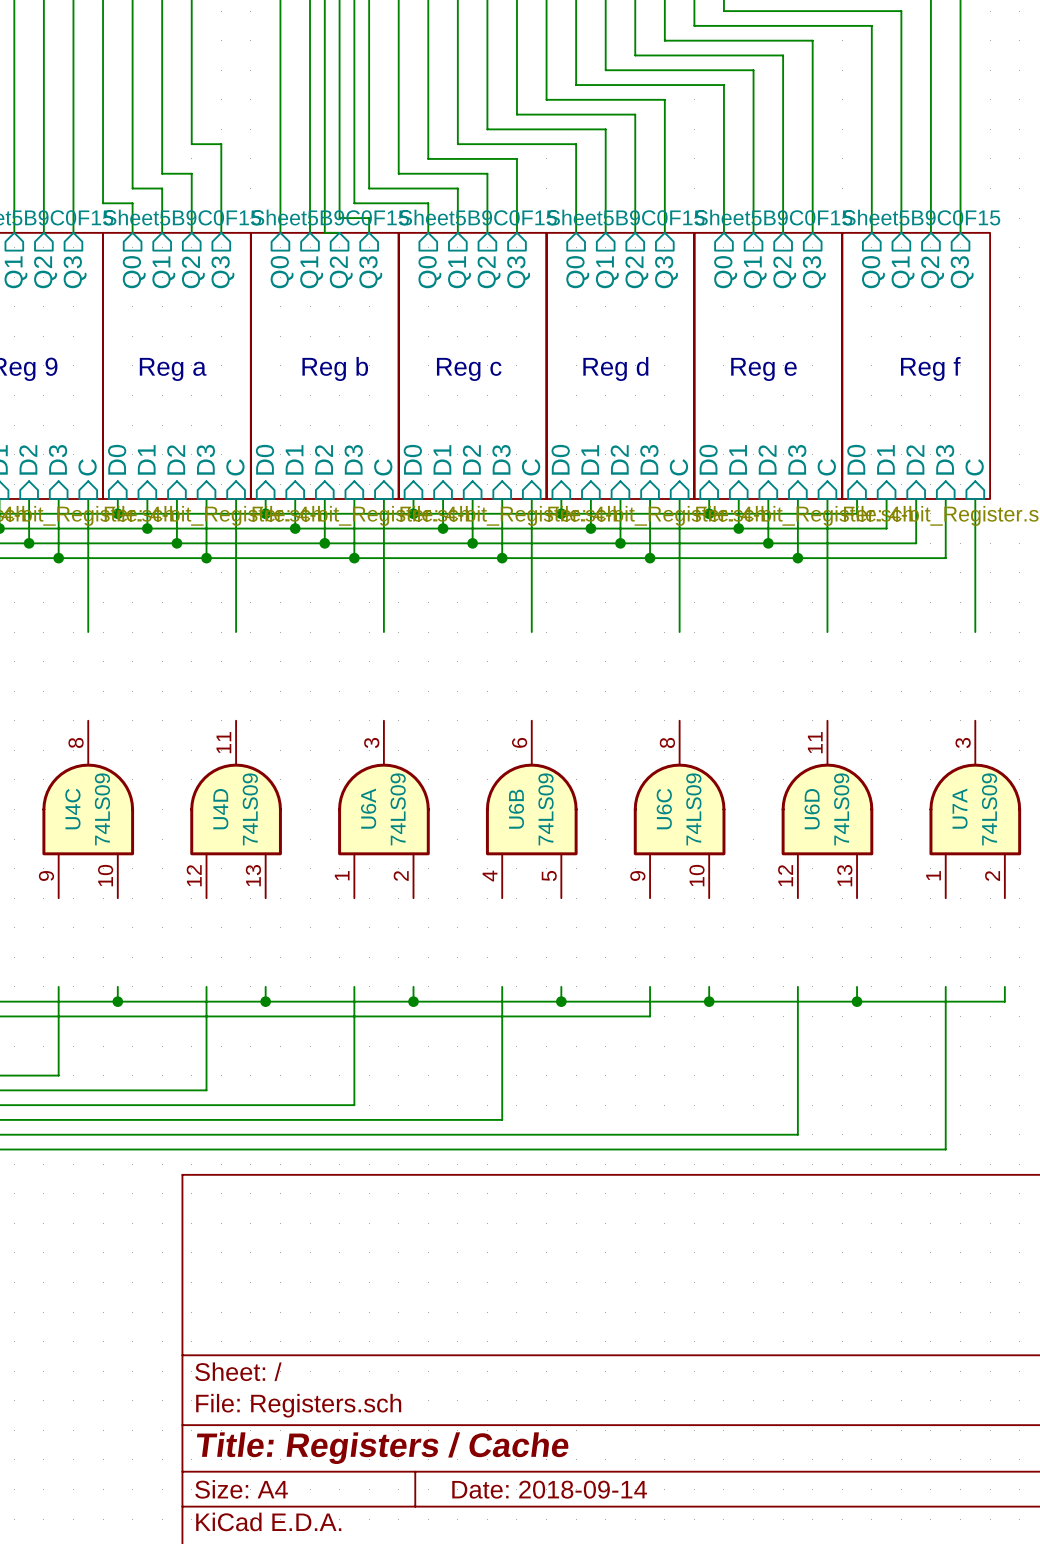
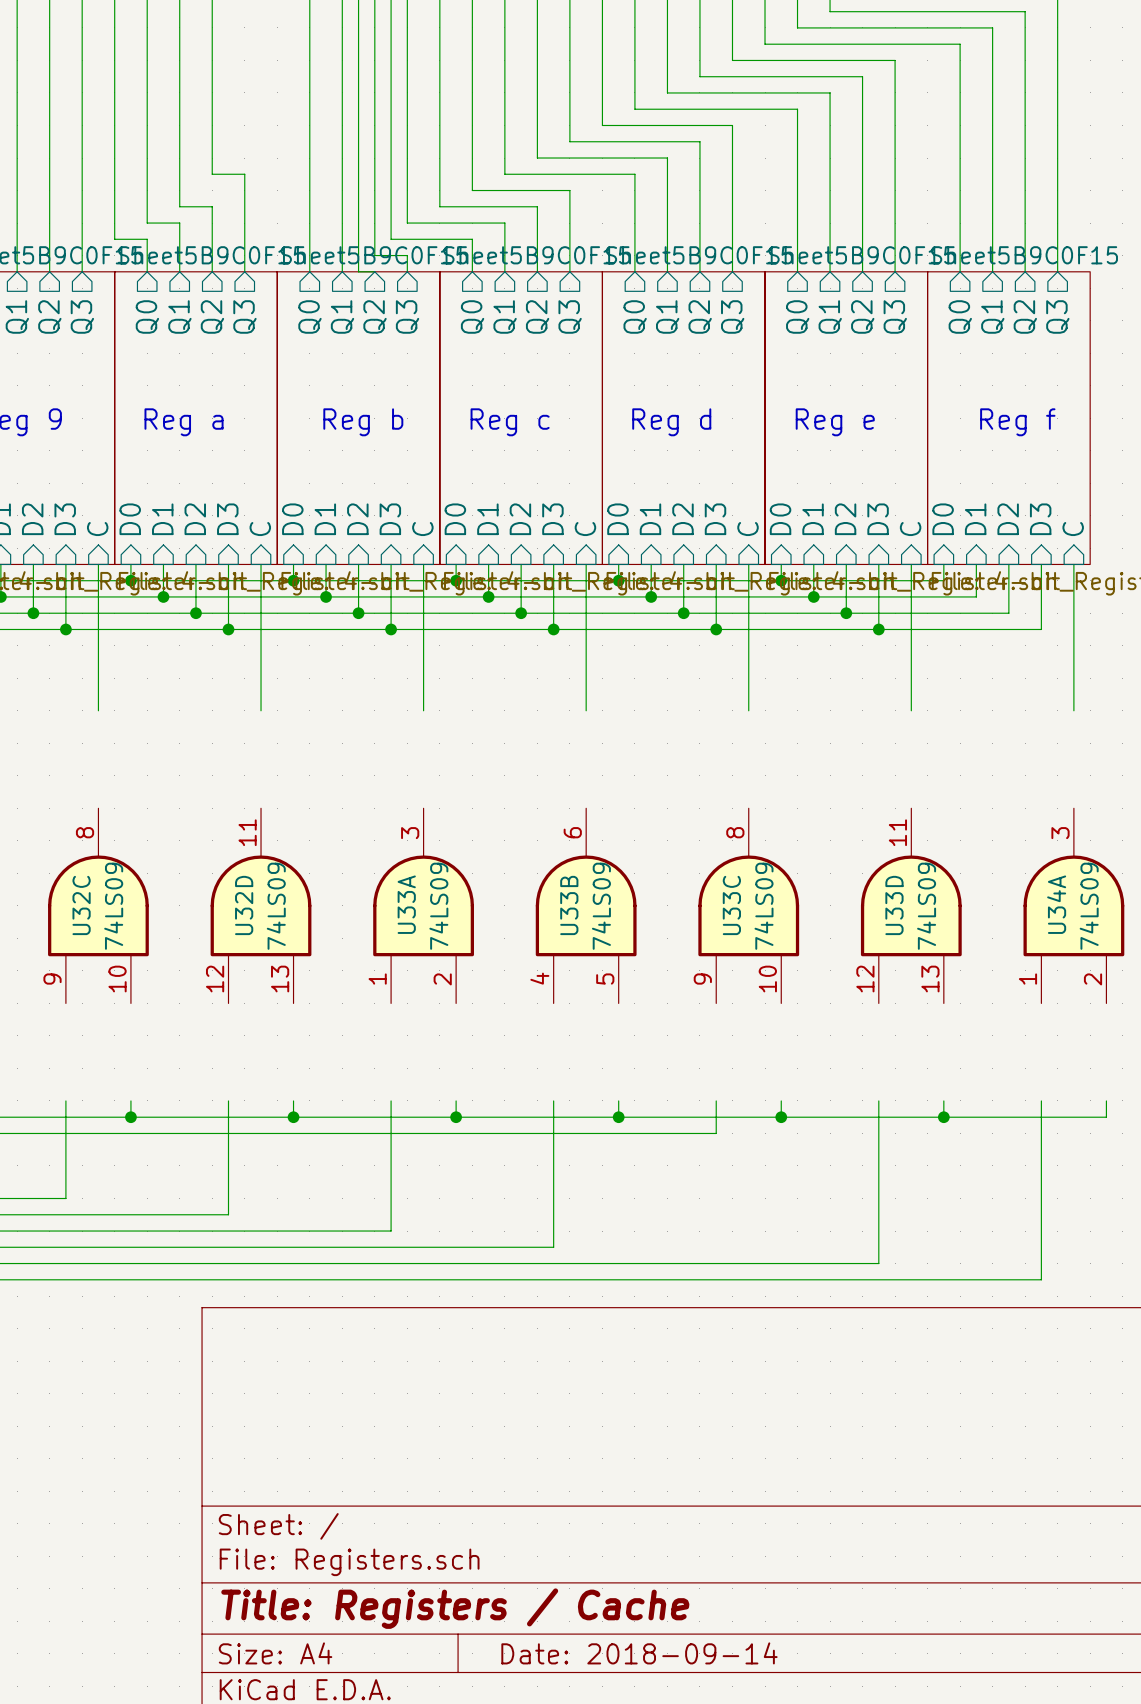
U6A name: U6A (368, 808) -> U33A (406, 904)
U7A name: U7A (960, 808) -> U34A (1056, 904)
U4C name: U4C (72, 809) -> U32C (81, 905)
U4D name: U4D (220, 809) -> U32D (244, 905)
U6B name: U6B (516, 809) -> U33B (569, 905)
U6C name: U6C (664, 809) -> U33C (731, 905)
U6D name: U6D (812, 809) -> U33D (894, 905)

